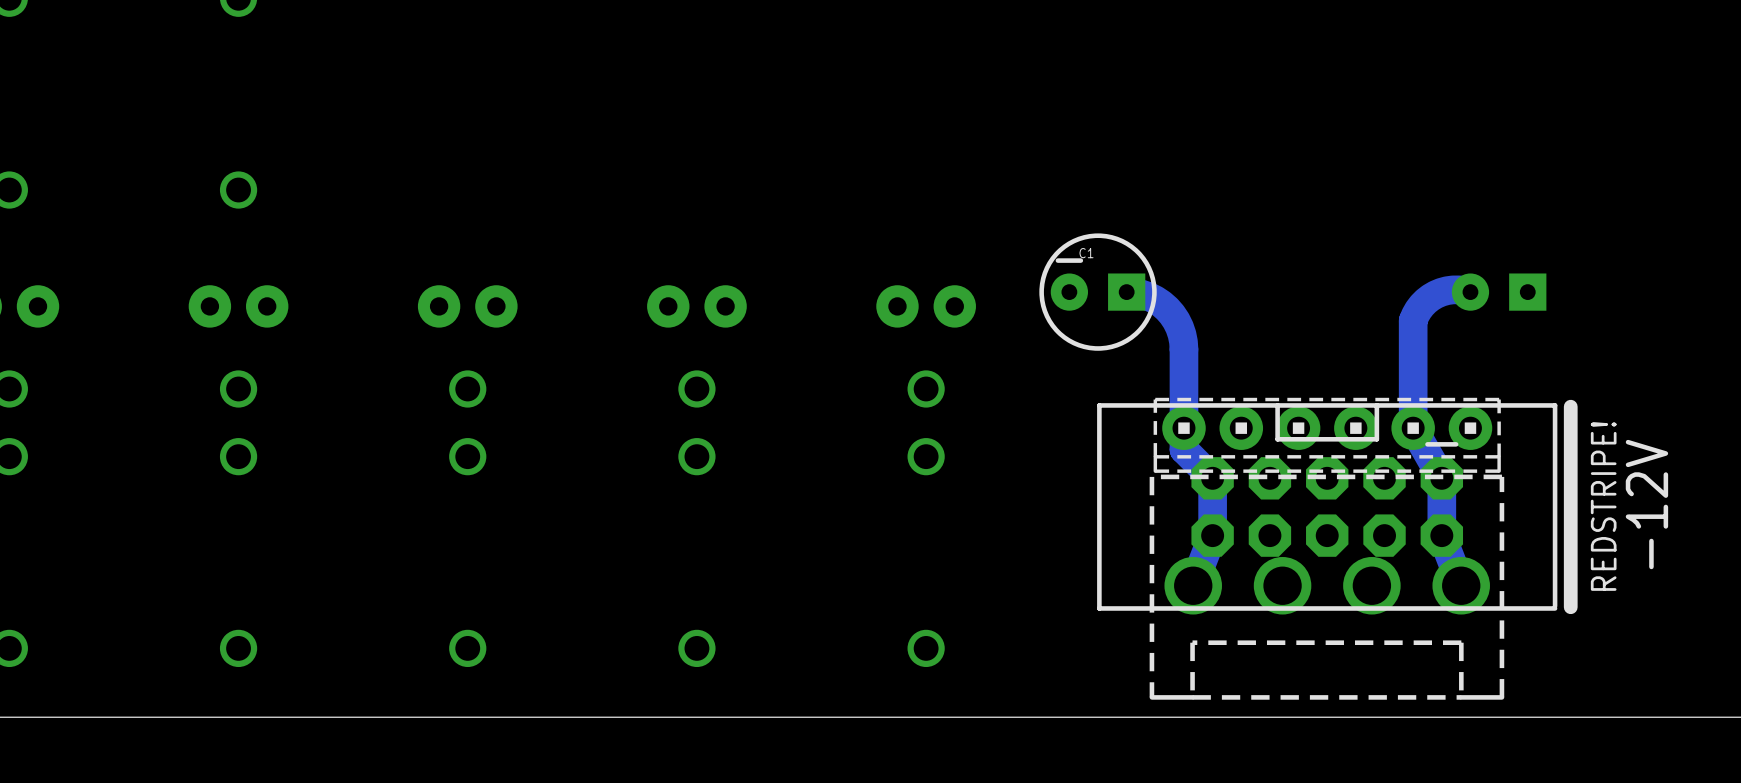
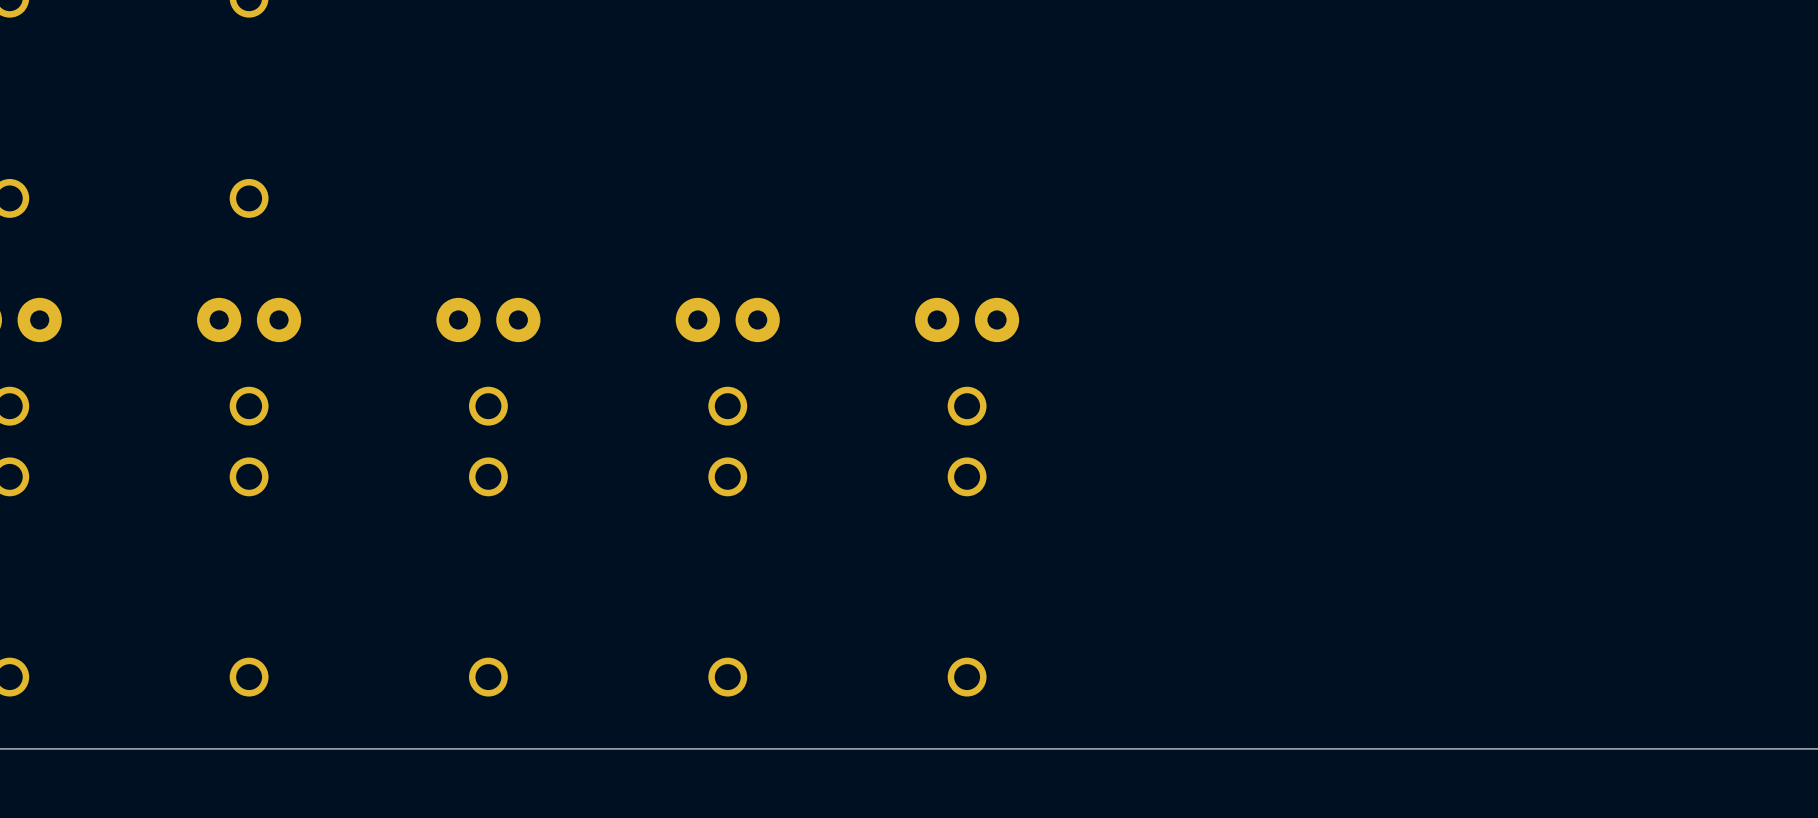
C1: (1098, 292) -> none
track: (1126, 292) (1141, 294) (1161, 303) (1172, 314) (1182, 334) (1183, 349) (1183, 449) (1212, 478) (1212, 535) (1193, 585) -> none
track: (1470, 292) (1452, 289) (1435, 294) (1421, 305) (1413, 320) (1413, 428) (1441, 478) (1441, 535) (1461, 585) -> none
part: (1499, 292) -> none
part: (1337, 548) -> none

